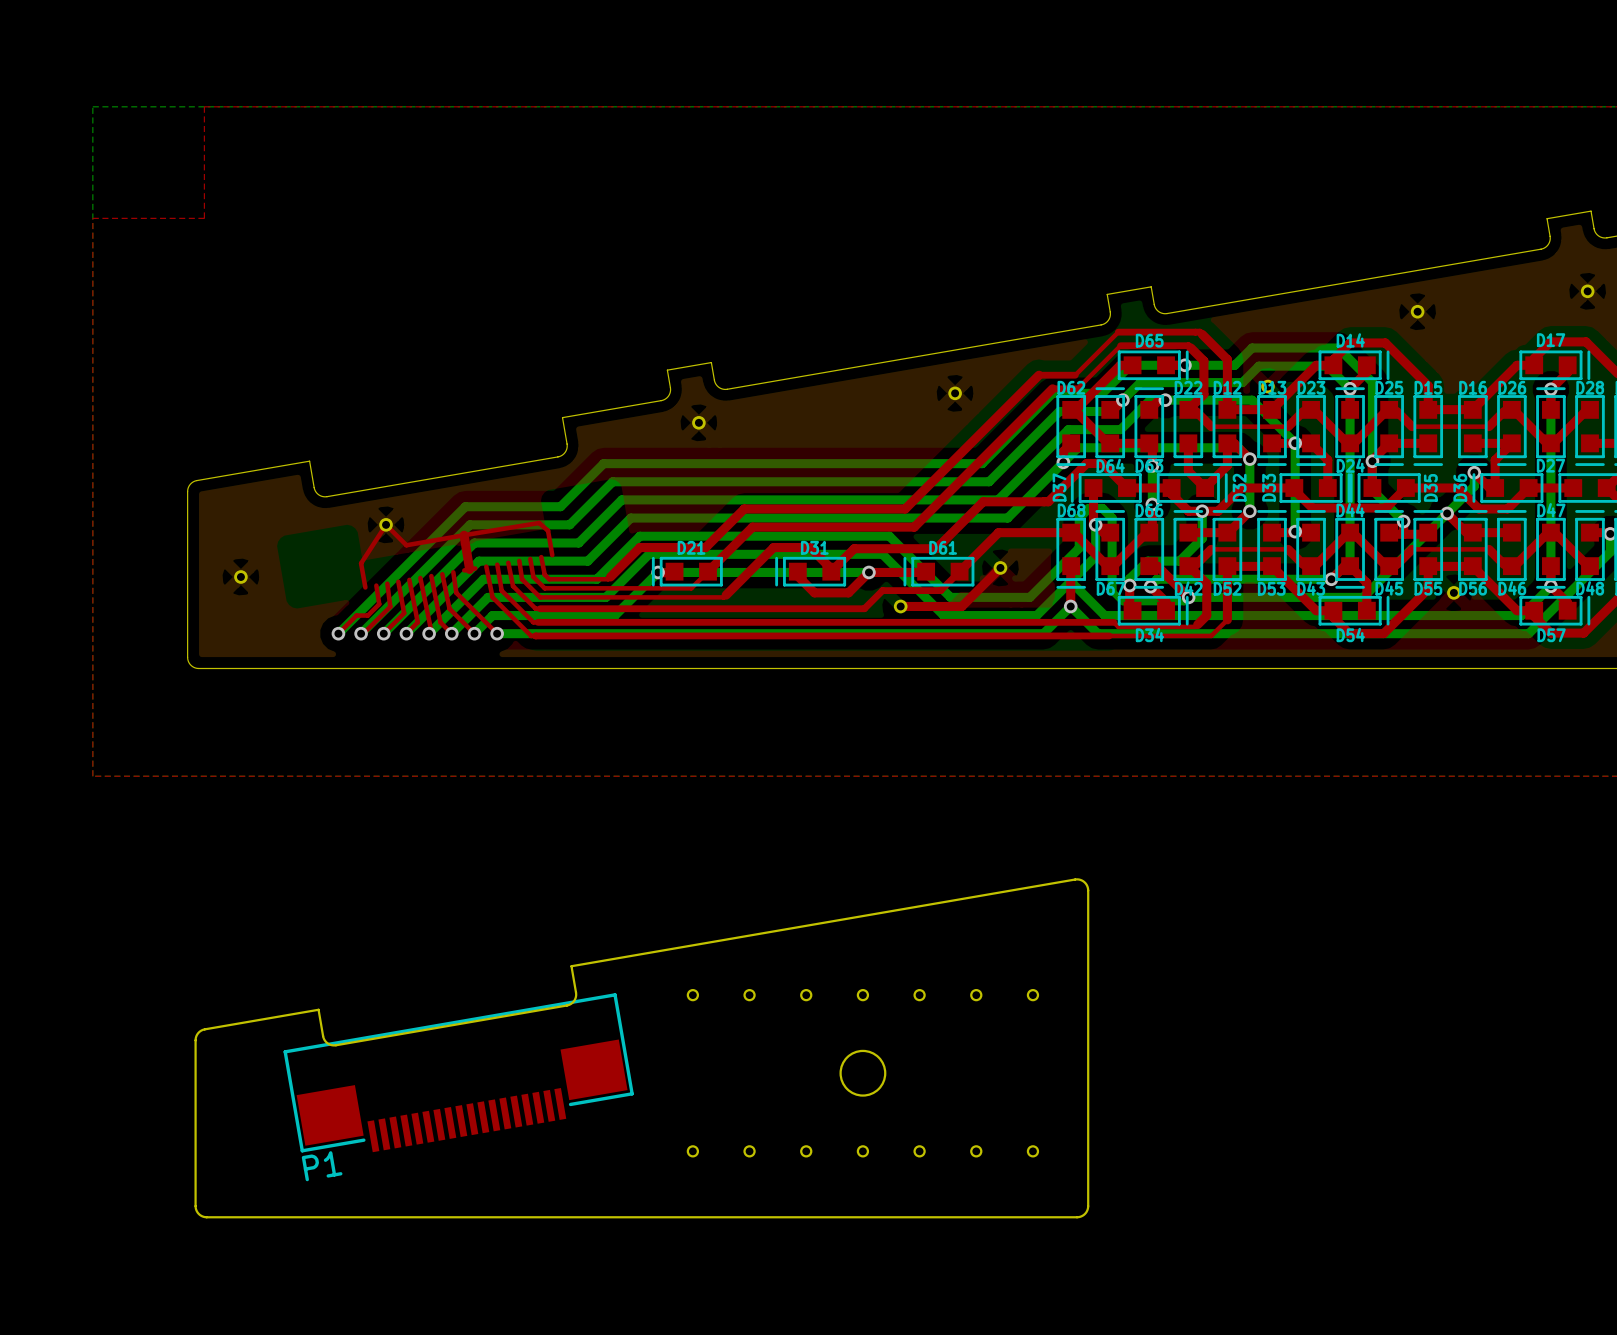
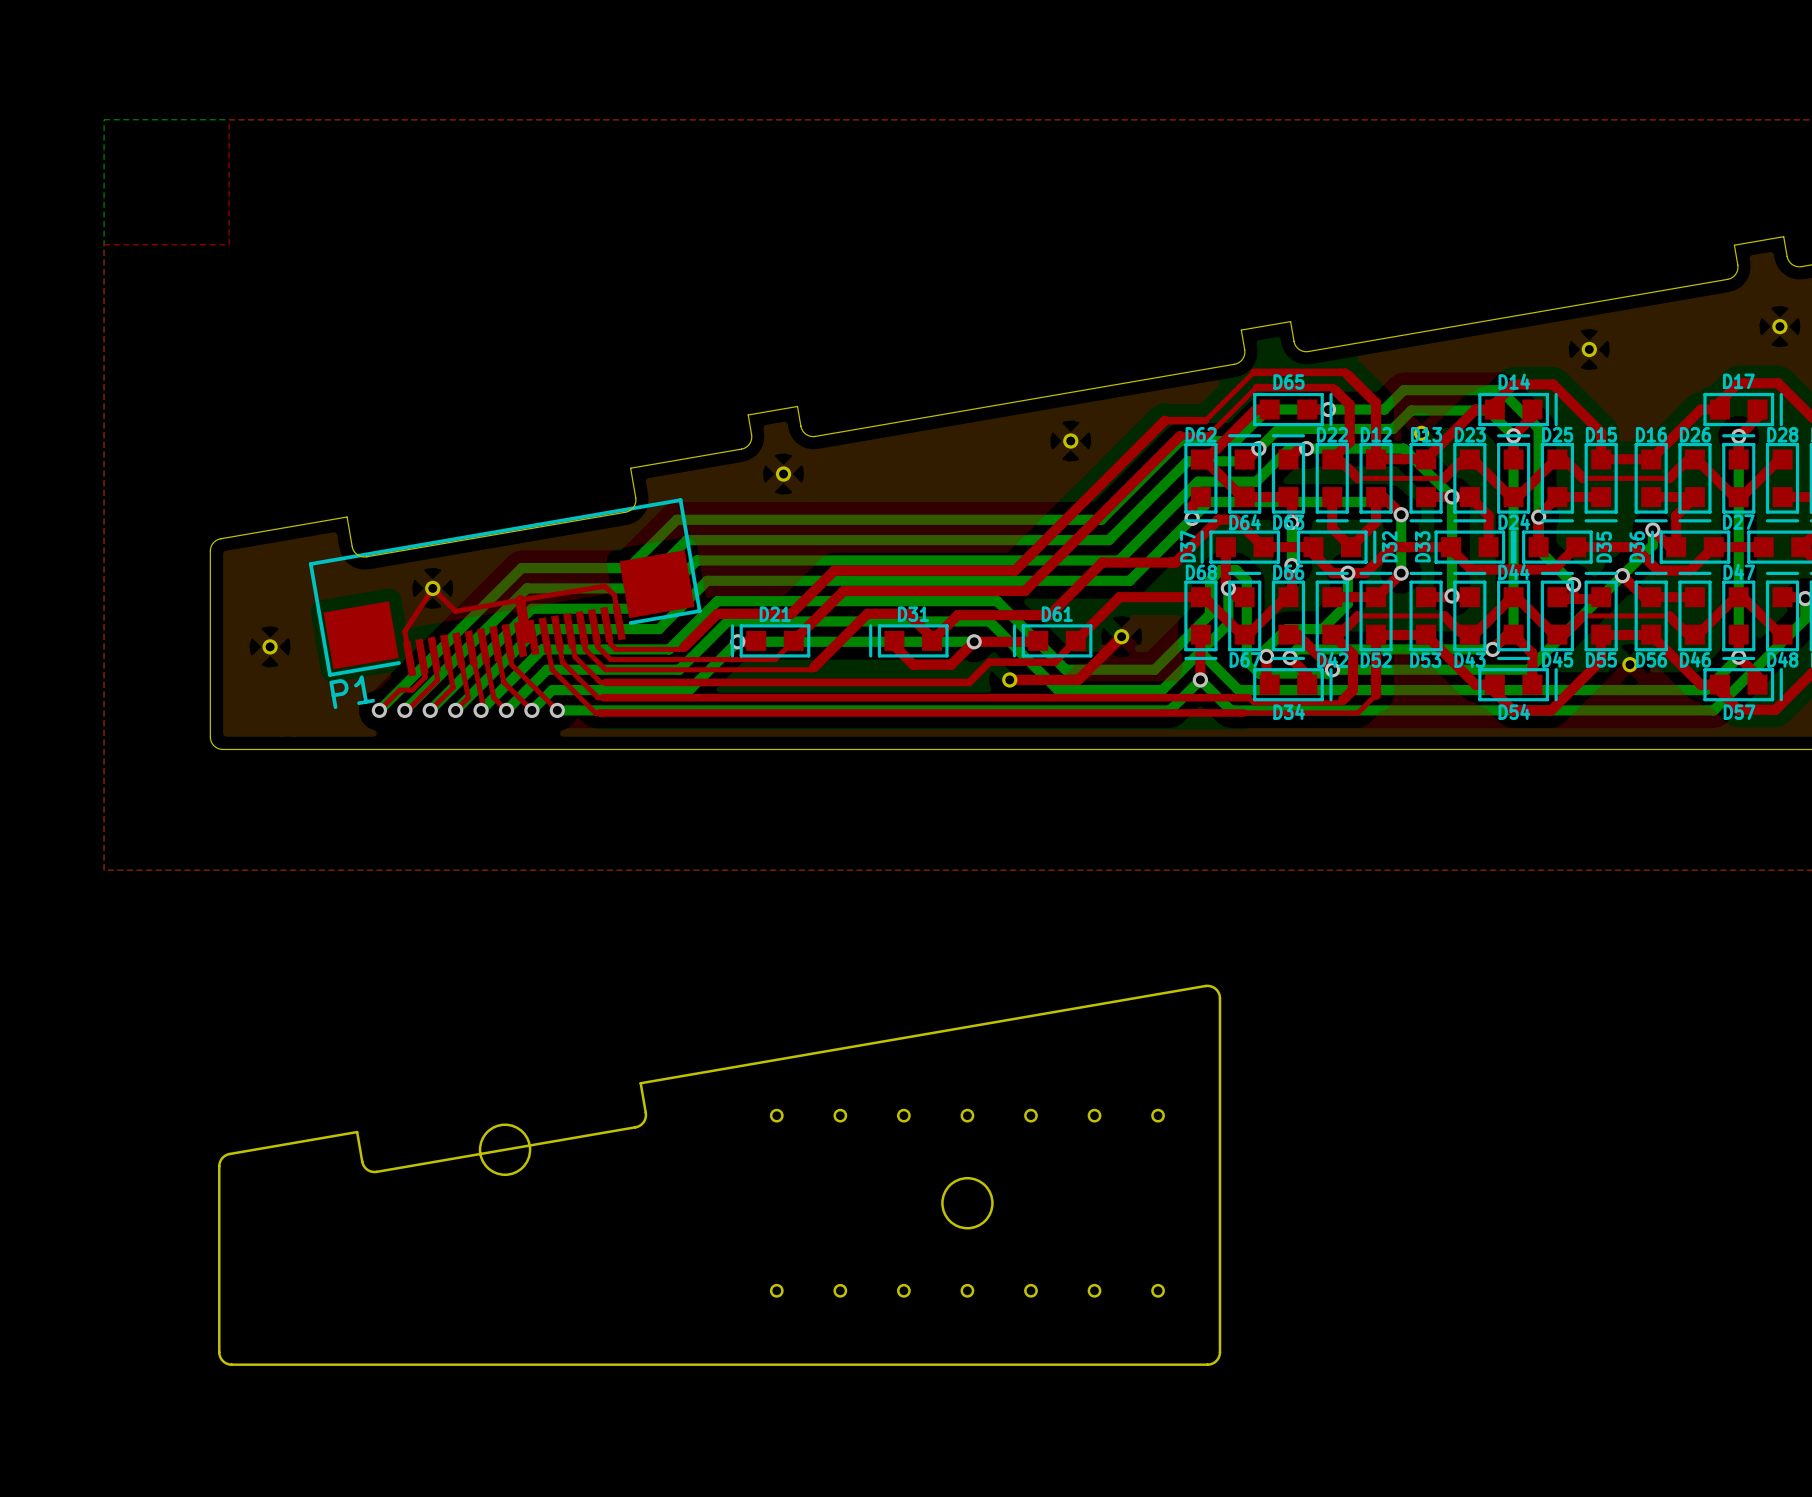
round board edge: none -> [478, 1123, 532, 1177]
P1 position: (458, 1072) -> (505, 587)

